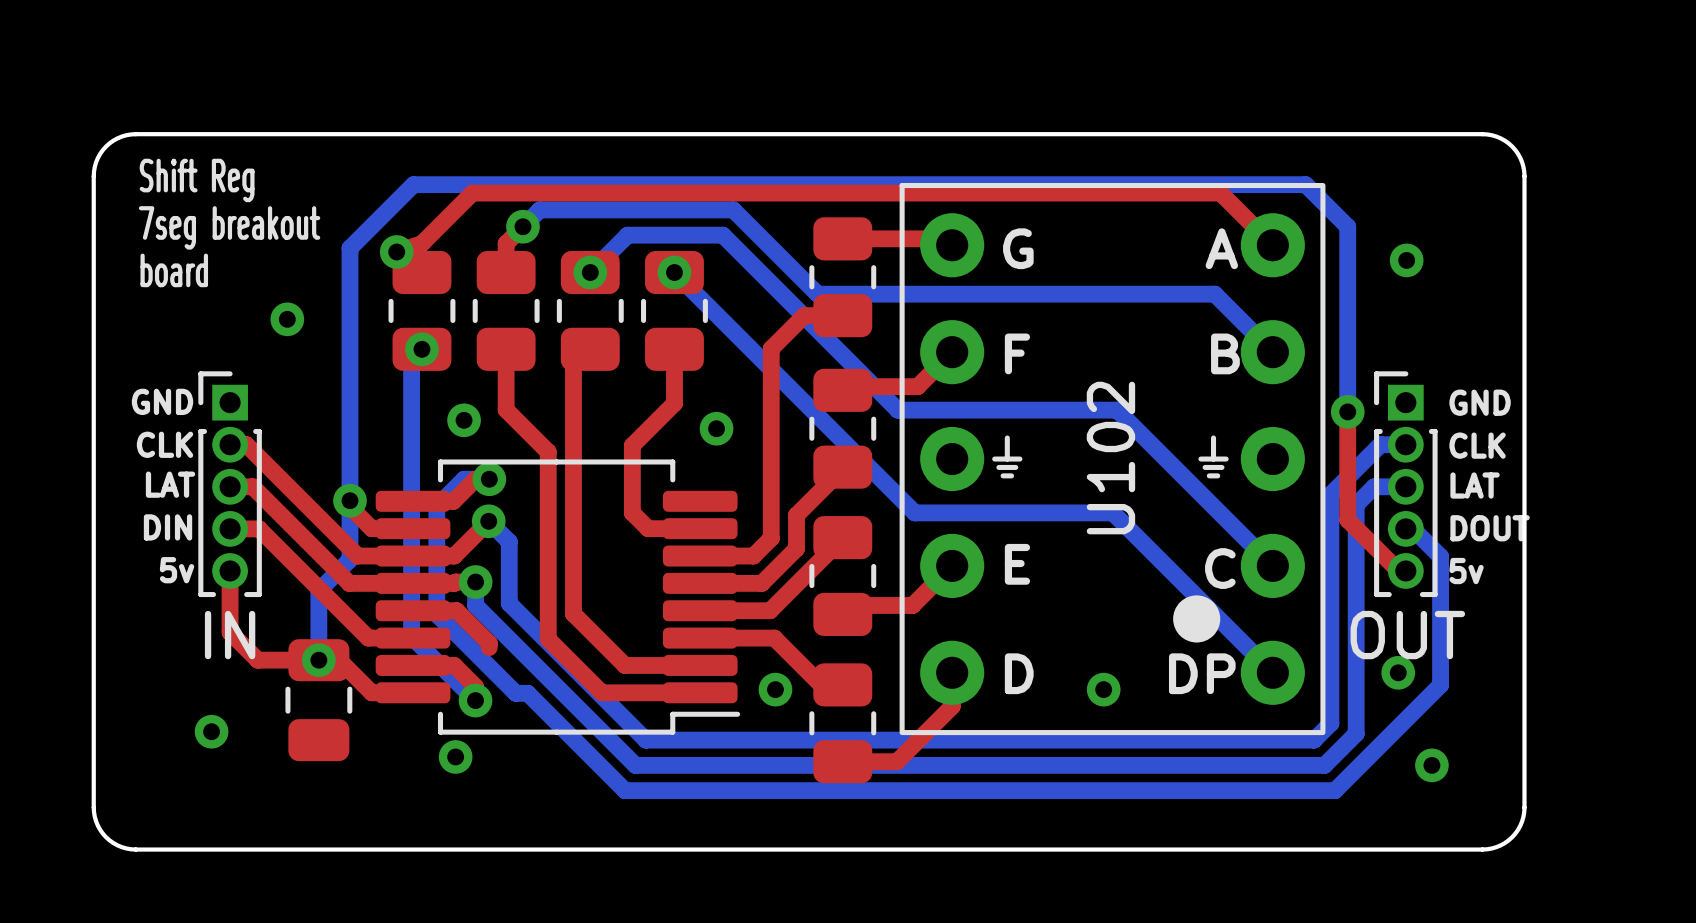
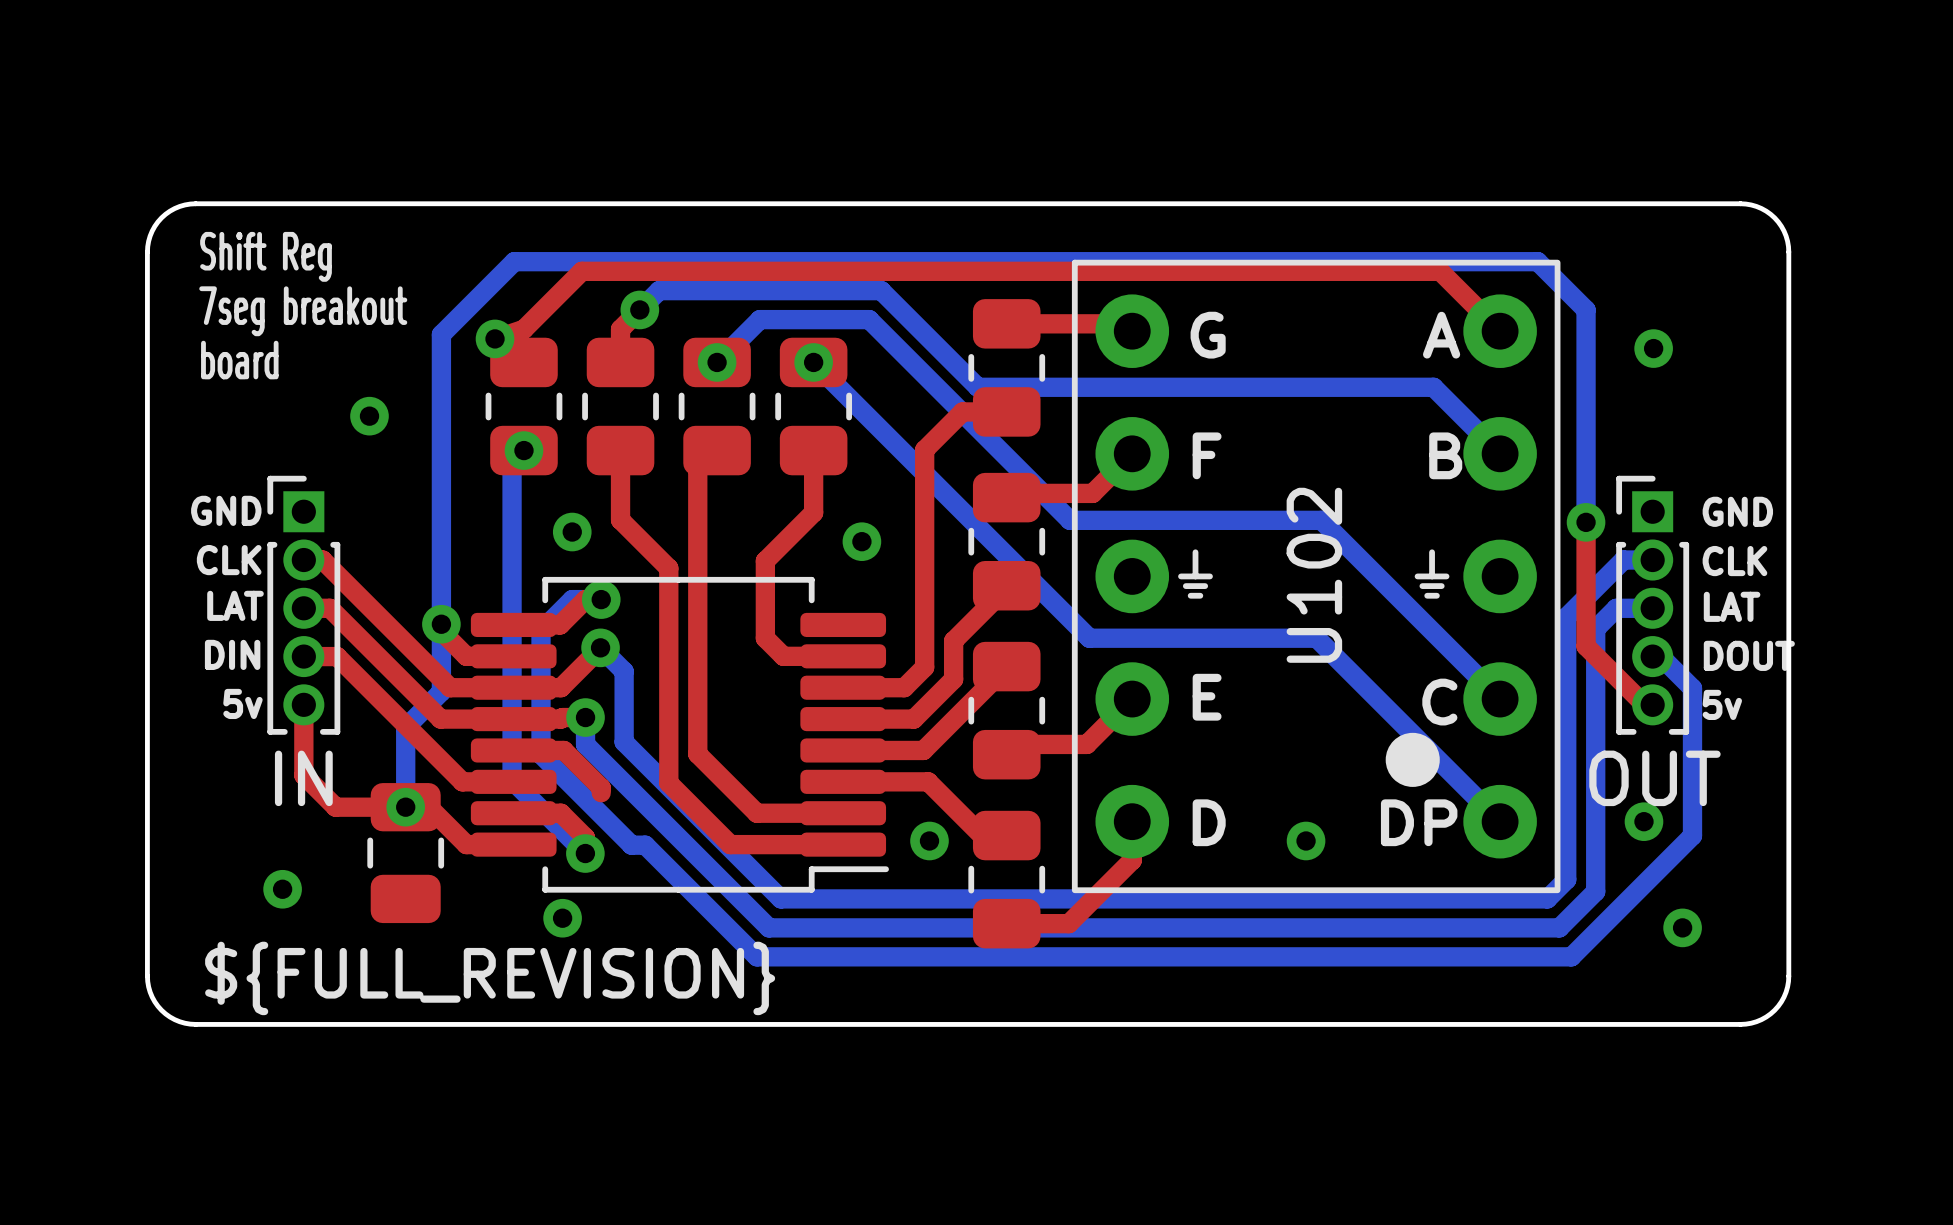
text: none -> ${FULL_REVISION} (490, 978)

